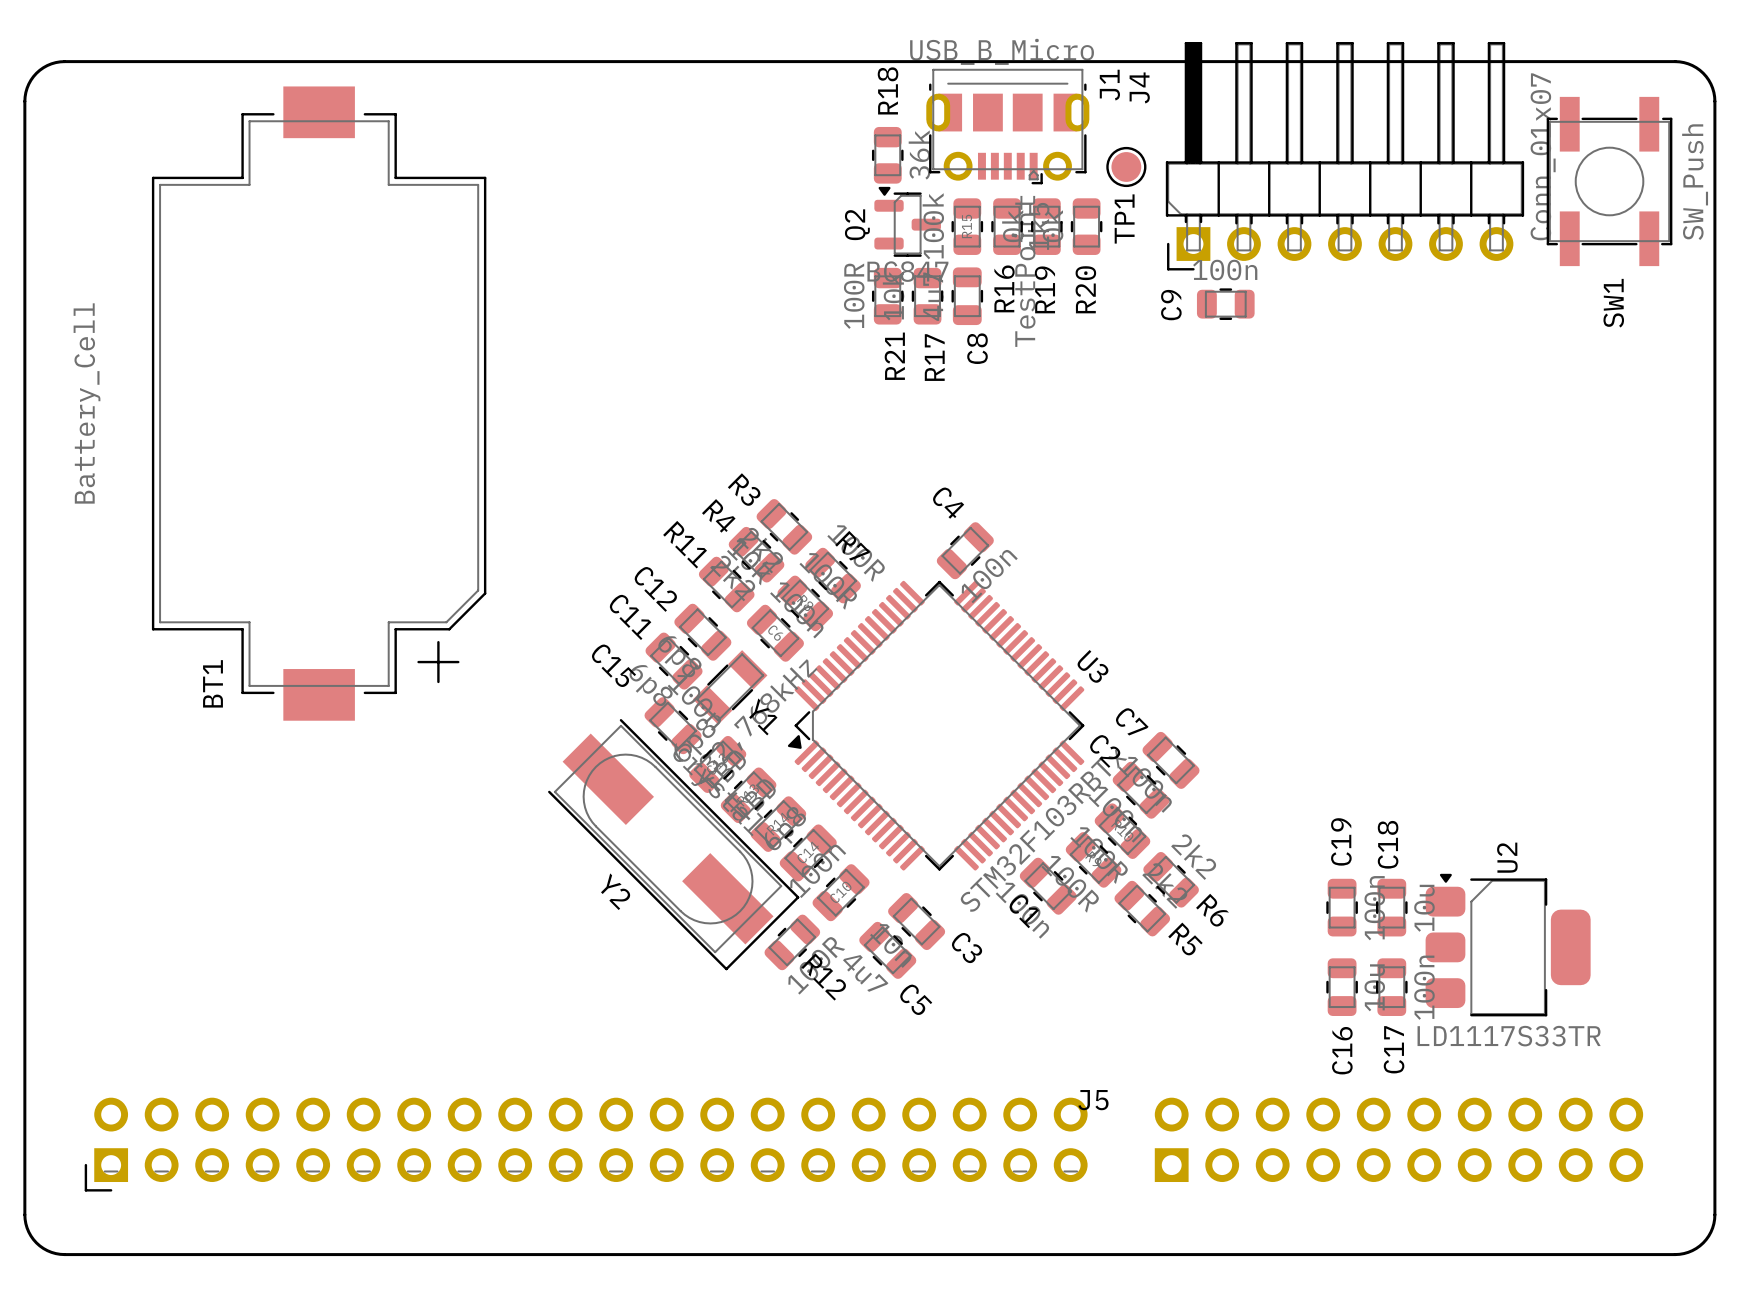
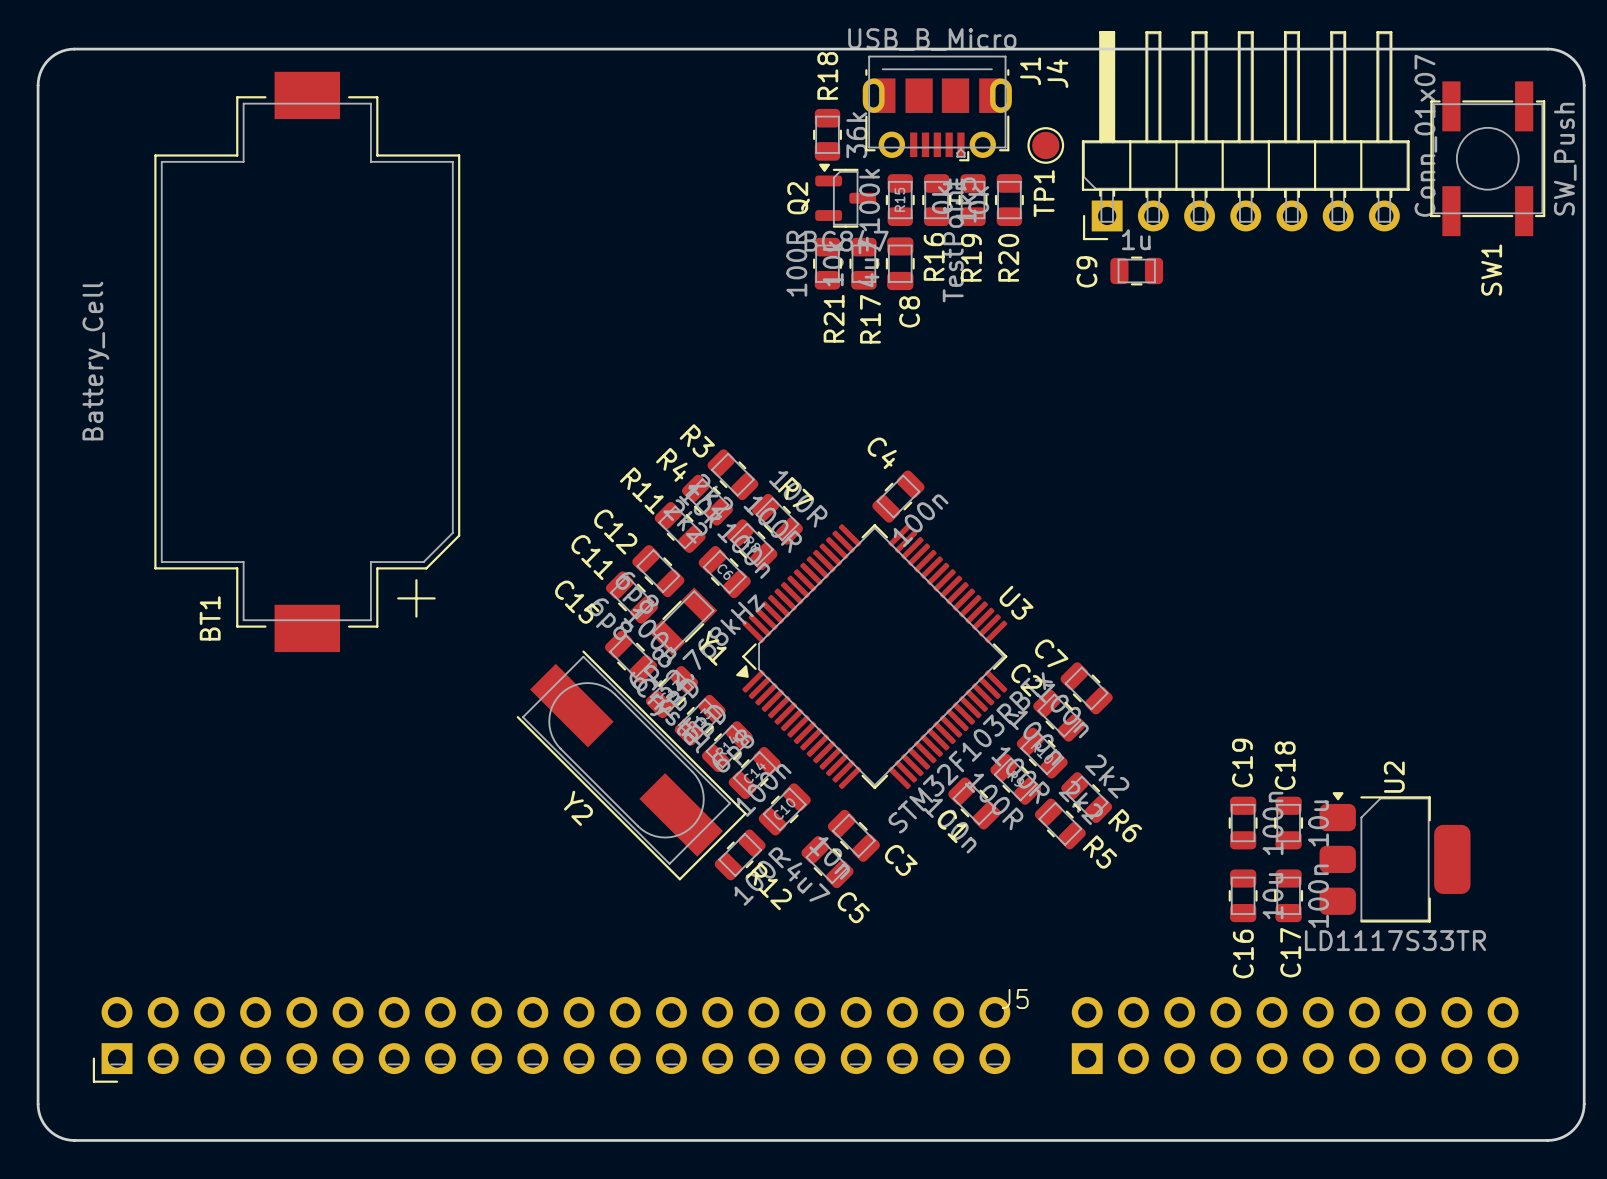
C9 value: 100n (1225, 270) -> 1u (1136, 239)

